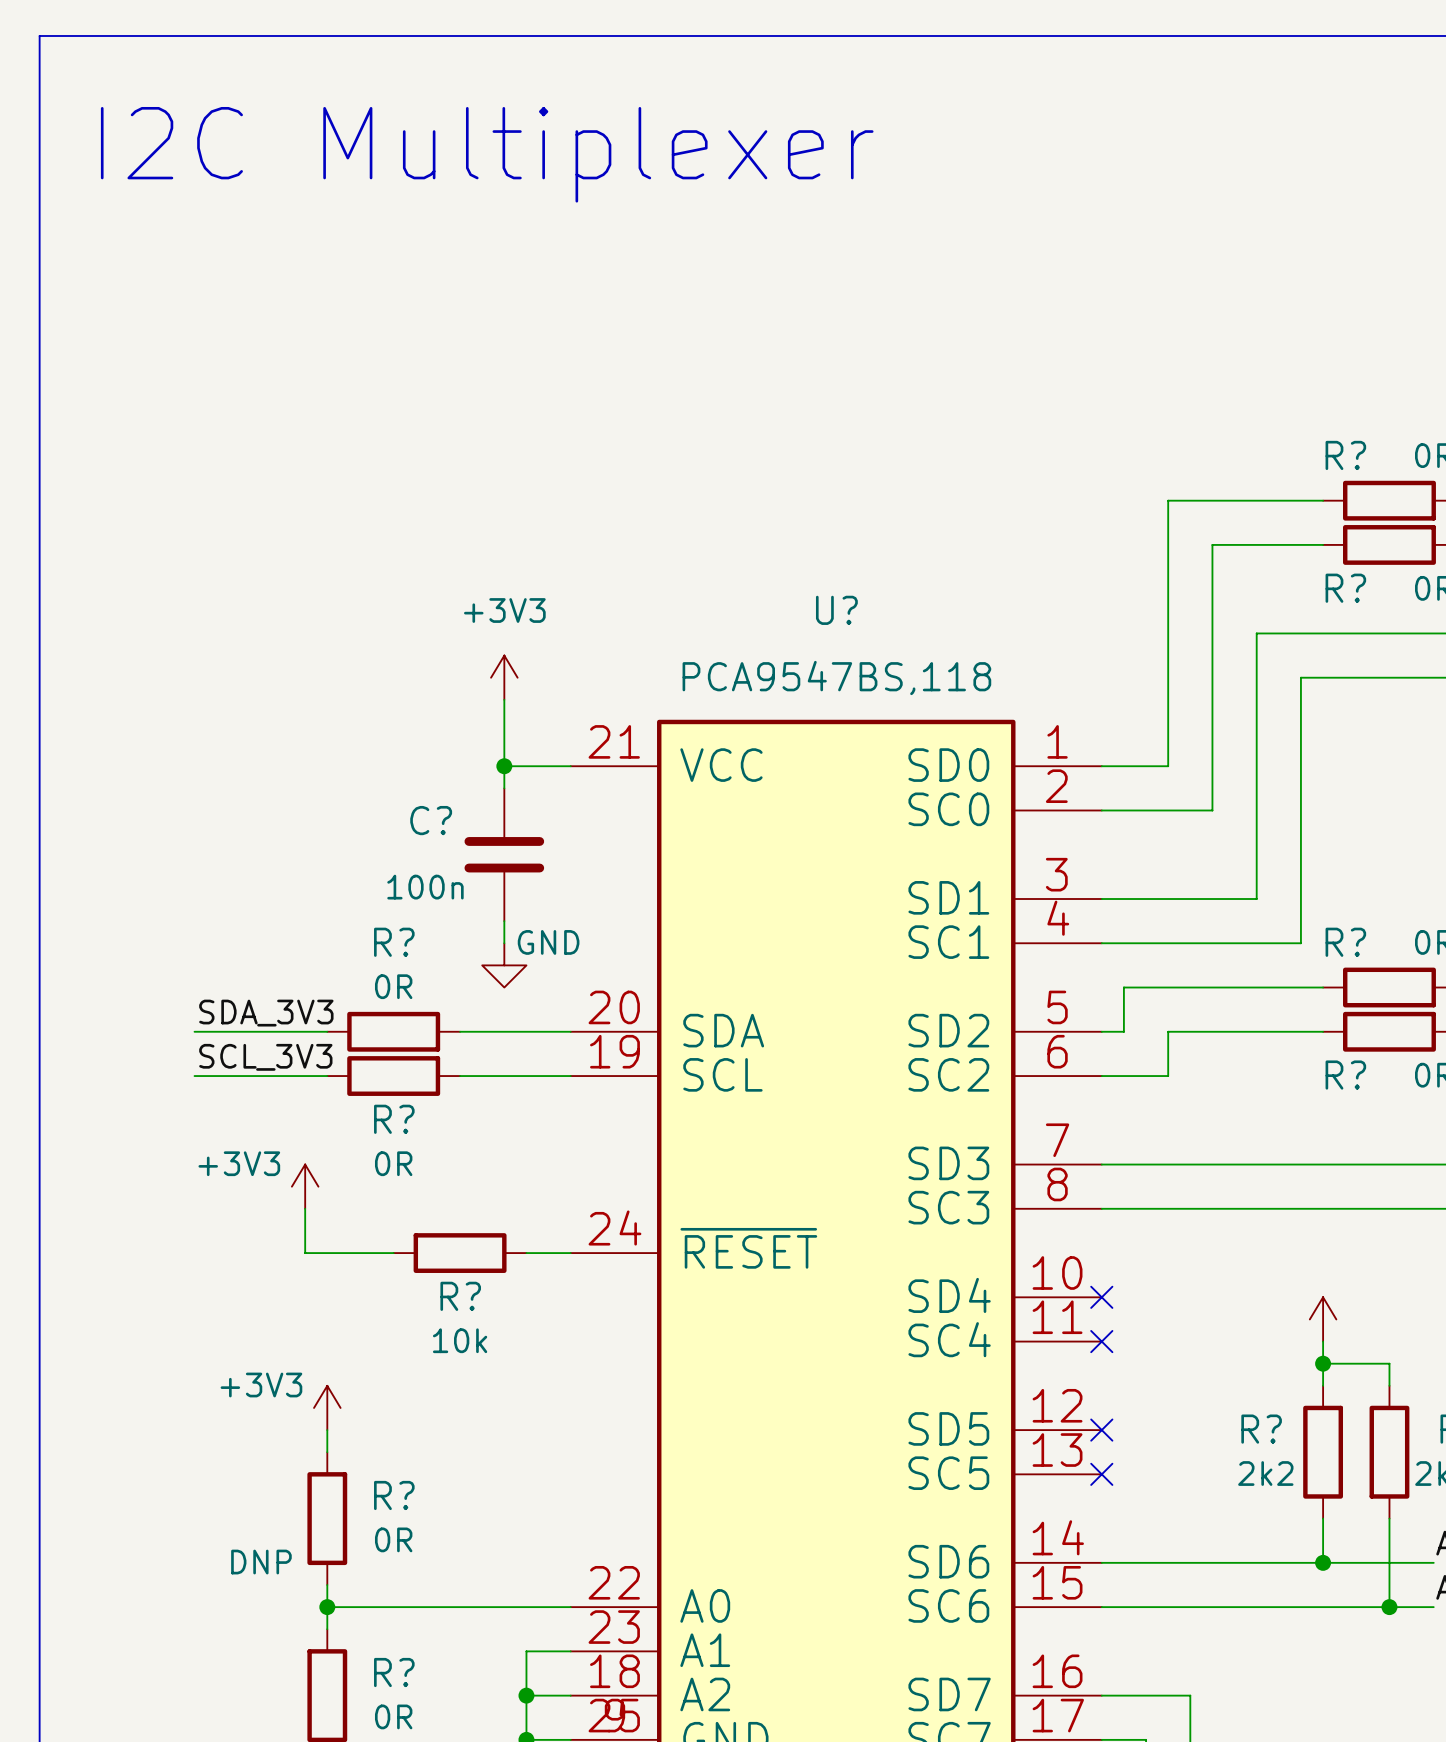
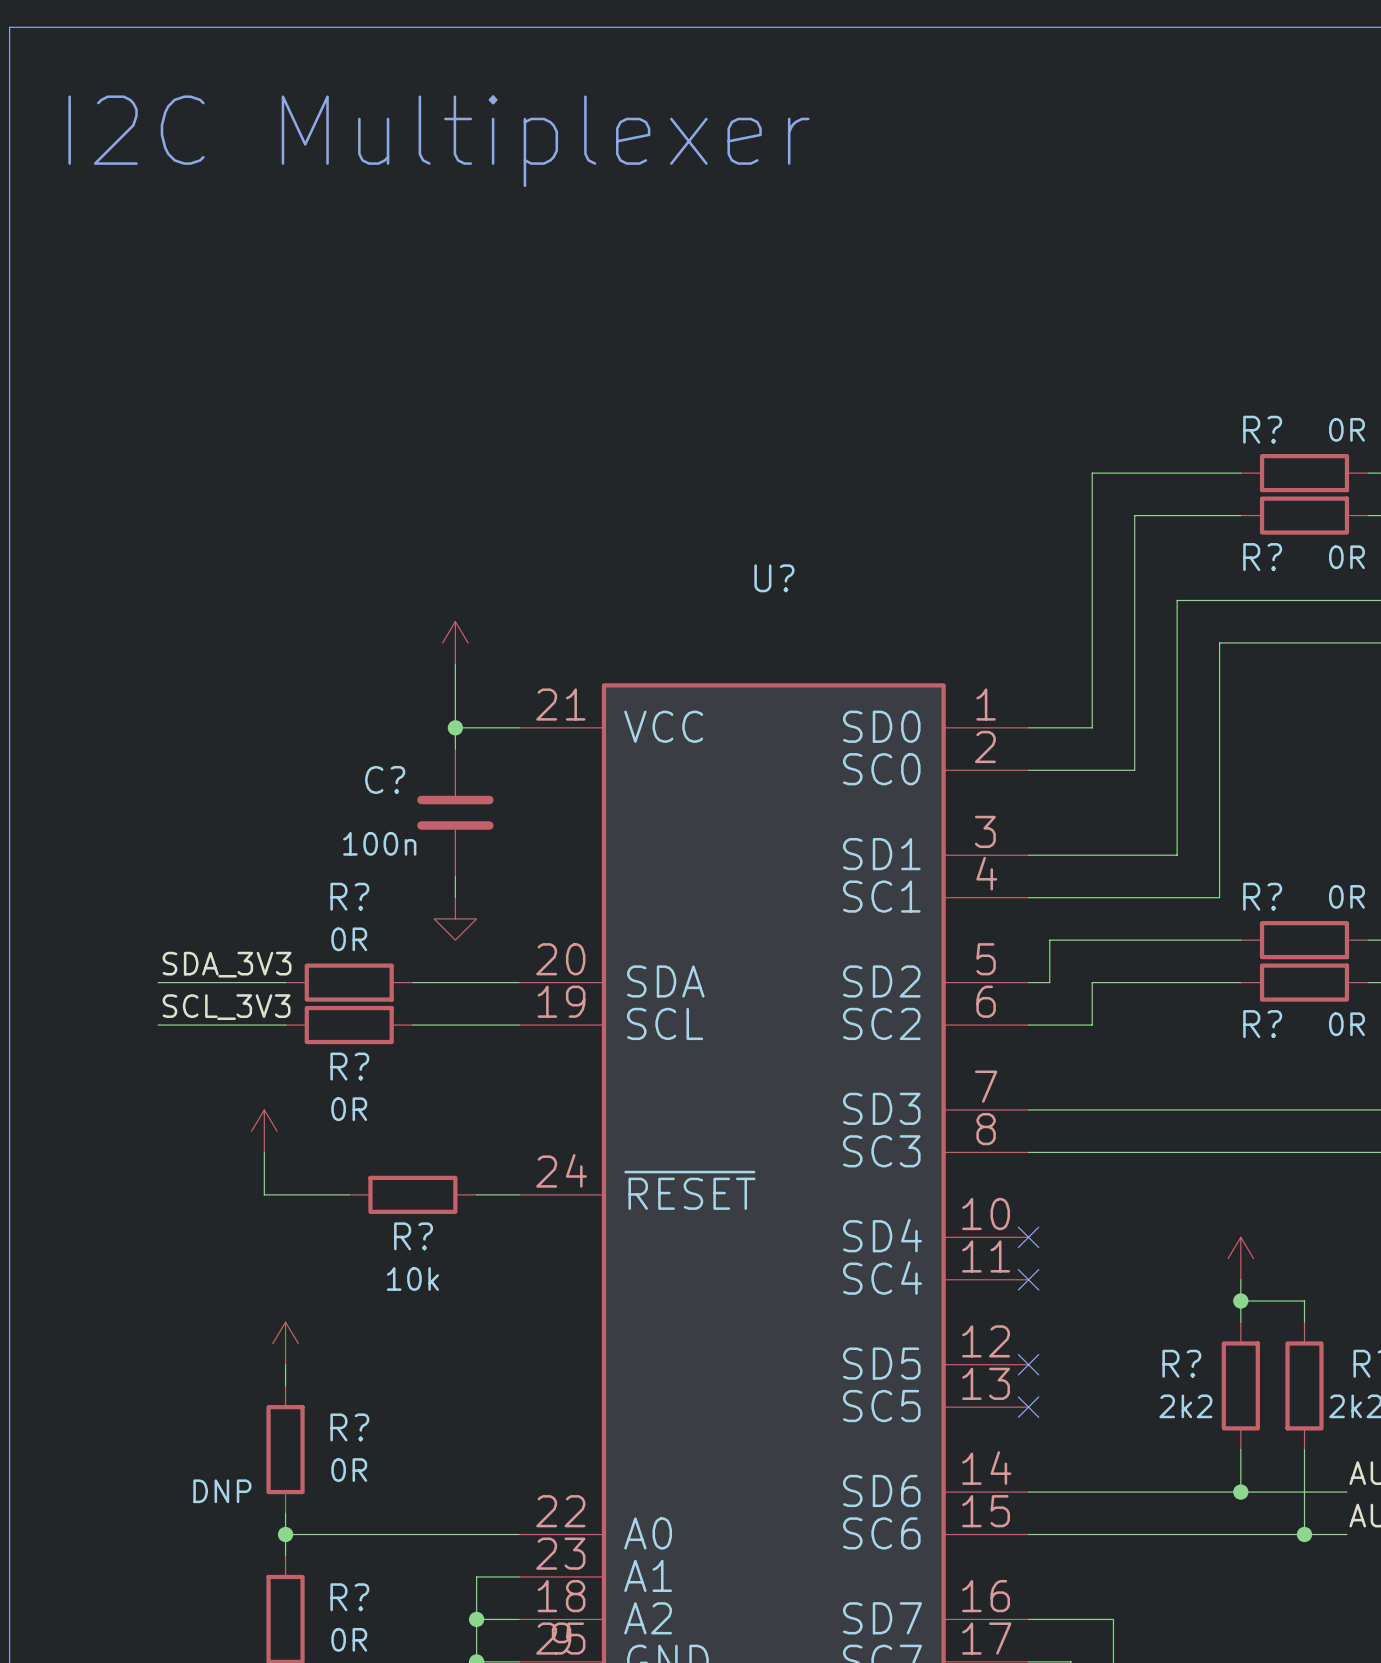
power symbol text: +3V3 (504, 610) -> none
U? value: PCA9547BS,118 (836, 677) -> none
power symbol text: GND (548, 942) -> none
power symbol text: +3V3 (239, 1163) -> none
power symbol text: +3V3 (261, 1385) -> none

